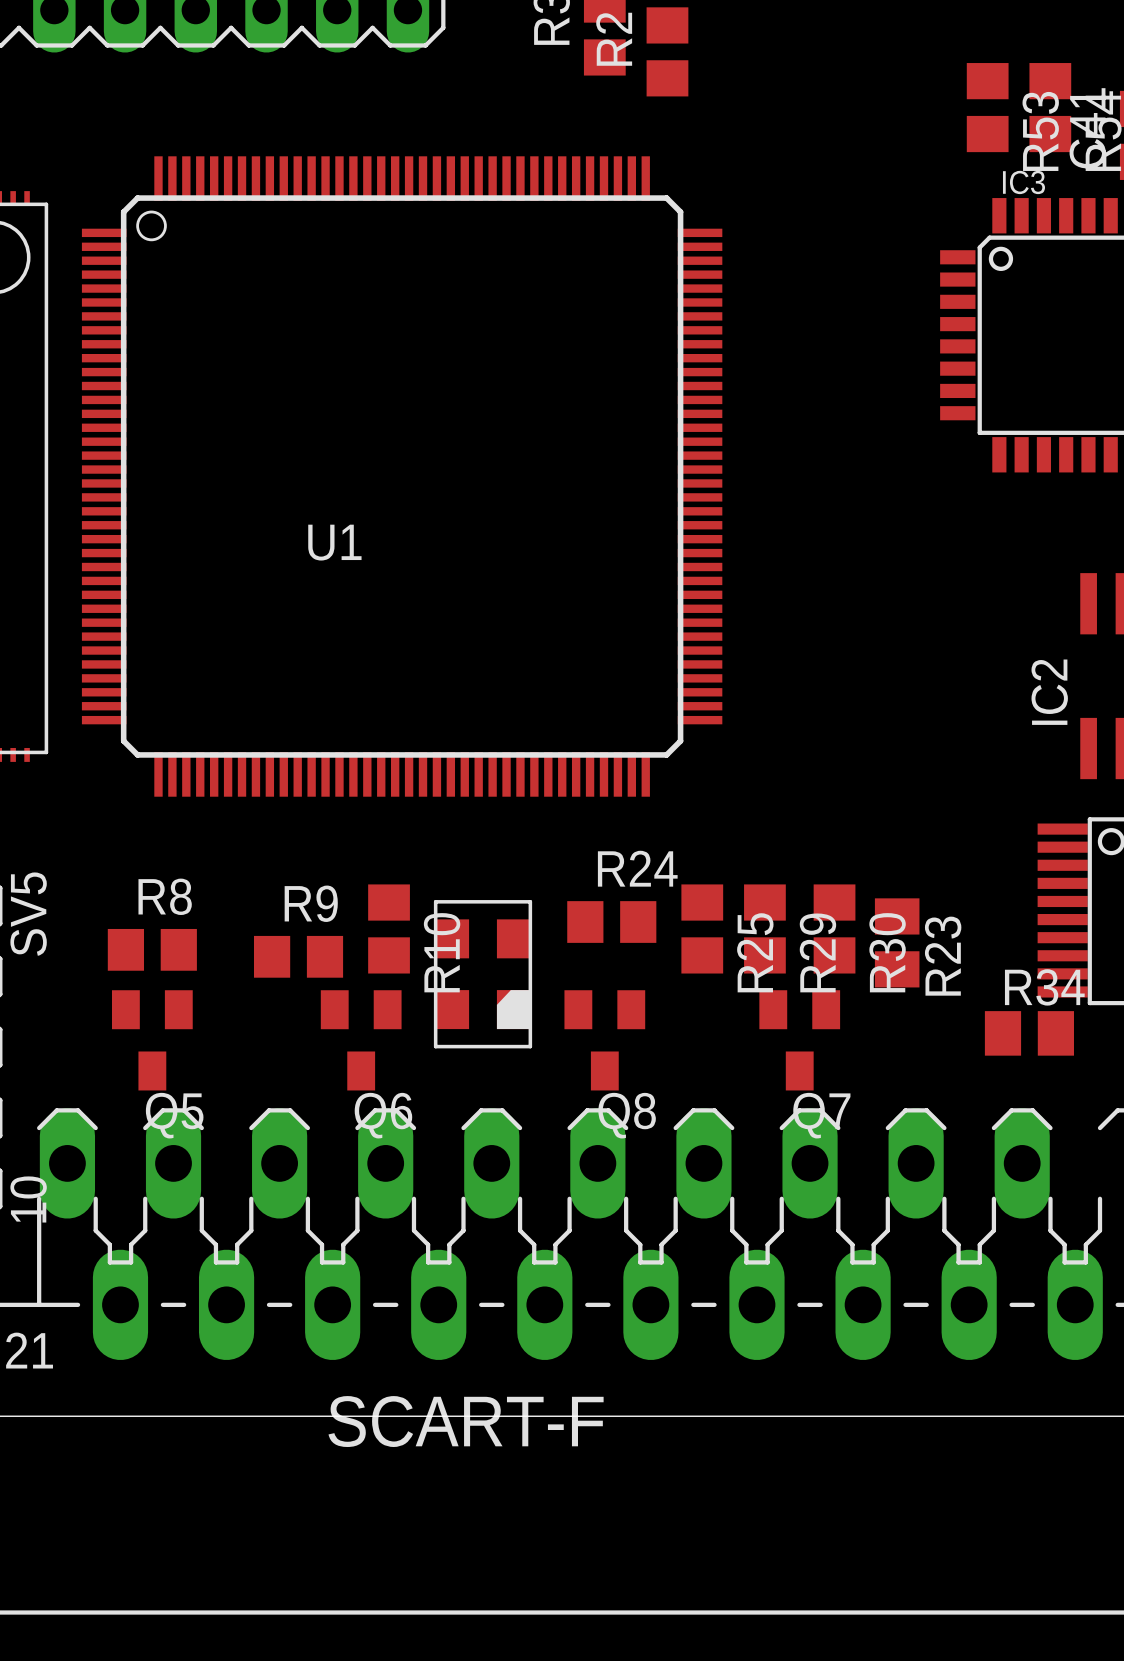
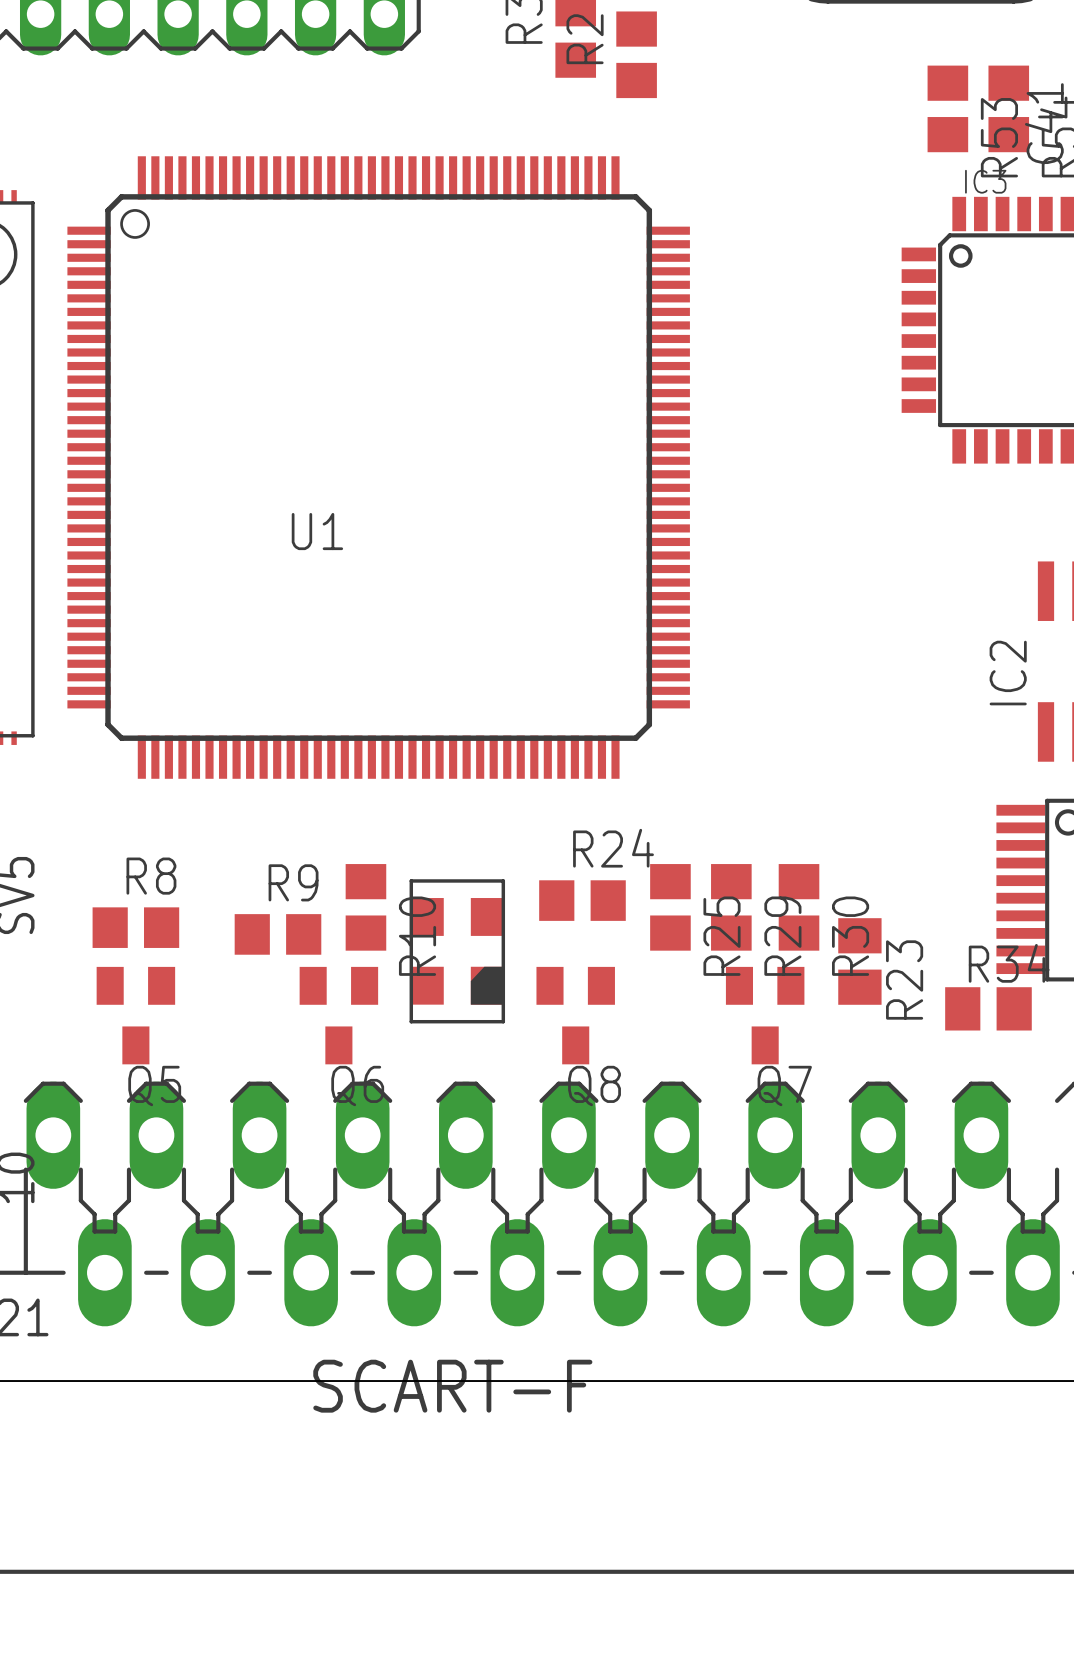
R23 position: (897, 942) -> (859, 961)

